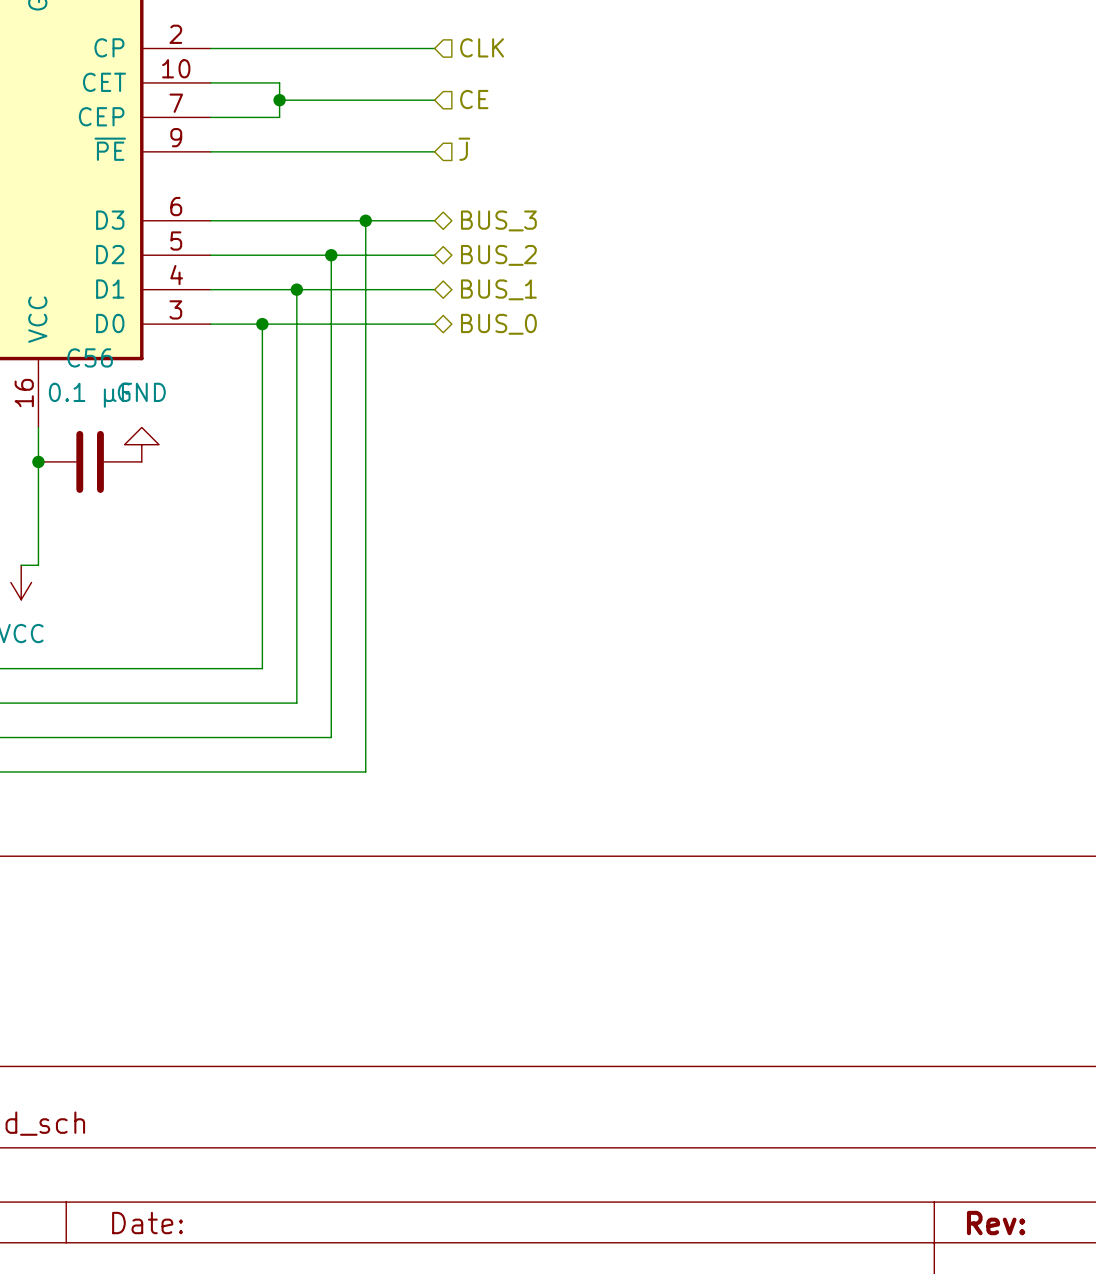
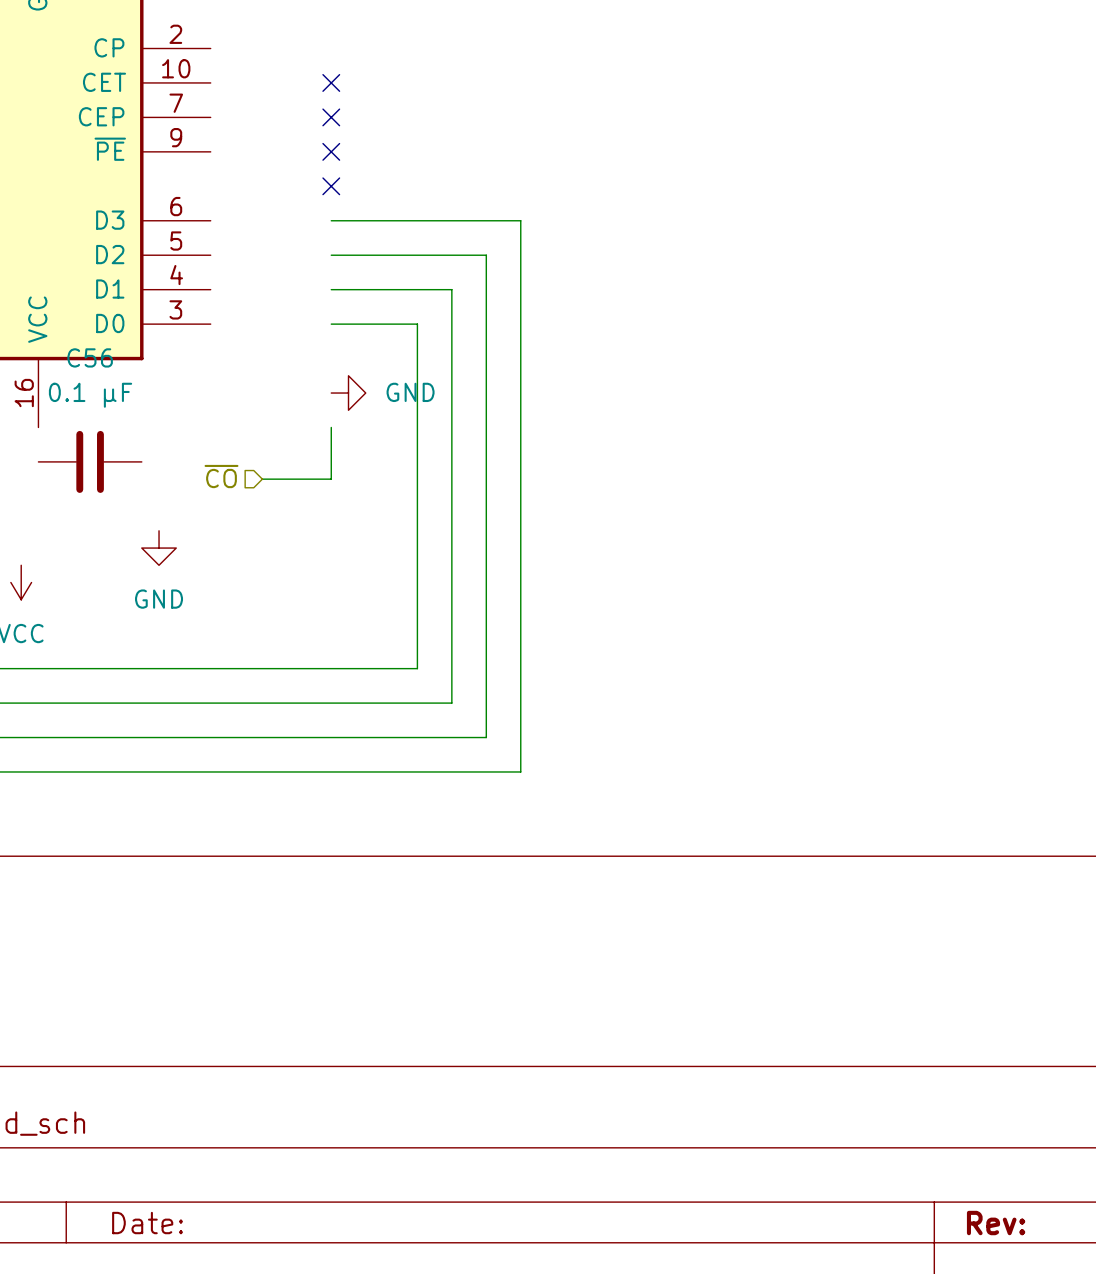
hierarchical label: CLK (482, 47) -> none
wire: (210, 48) (434, 48) -> none
wire: (210, 82) (279, 82) (279, 117) (210, 117) -> none
no-connect mark: none -> (331, 82)
hierarchical label: CE (474, 99) -> none
wire: (279, 100) (434, 100) -> none
junction: (279, 100) -> none
no-connect mark: none -> (331, 117)
hierarchical label: ~{J} (464, 149) -> none
wire: (210, 151) (434, 151) -> none
no-connect mark: none -> (331, 151)
no-connect mark: none -> (331, 186)
wire: (210, 220) (331, 220) -> none
wire: (365, 220) (365, 771) -> (434, 220) (520, 220) (520, 771) (365, 771)
junction: (365, 220) -> none
hierarchical label: BUS_3 (498, 220) -> none
wire: (210, 255) (331, 255) (331, 427) -> none
junction: (331, 255) -> none
hierarchical label: BUS_2 (498, 255) -> none
wire: (210, 289) (331, 289) -> none
wire: (296, 289) (296, 703) -> (434, 289) (451, 289) (451, 703) (296, 703)
junction: (296, 289) -> none
hierarchical label: BUS_1 (498, 289) -> none
wire: (210, 324) (331, 324) -> none
wire: (262, 324) (262, 668) -> (417, 324) (417, 668) (262, 668)
junction: (262, 324) -> none
wire: (417, 324) (434, 324) -> none
hierarchical label: BUS_0 (498, 324) -> none
power symbol: none -> GND (348, 393)
wire: (38, 427) (38, 565) (21, 565) -> none
power symbol rotation: 0° (141, 444) -> 180° (159, 548)
power symbol position: GND (141, 444) -> GND (159, 548)
junction: (38, 461) -> none
hierarchical label: none -> ~{CO} (221, 476)
wire: none -> (262, 479) (331, 479)
wire: (331, 479) (331, 737) -> (434, 255) (486, 255) (486, 737) (331, 737)

